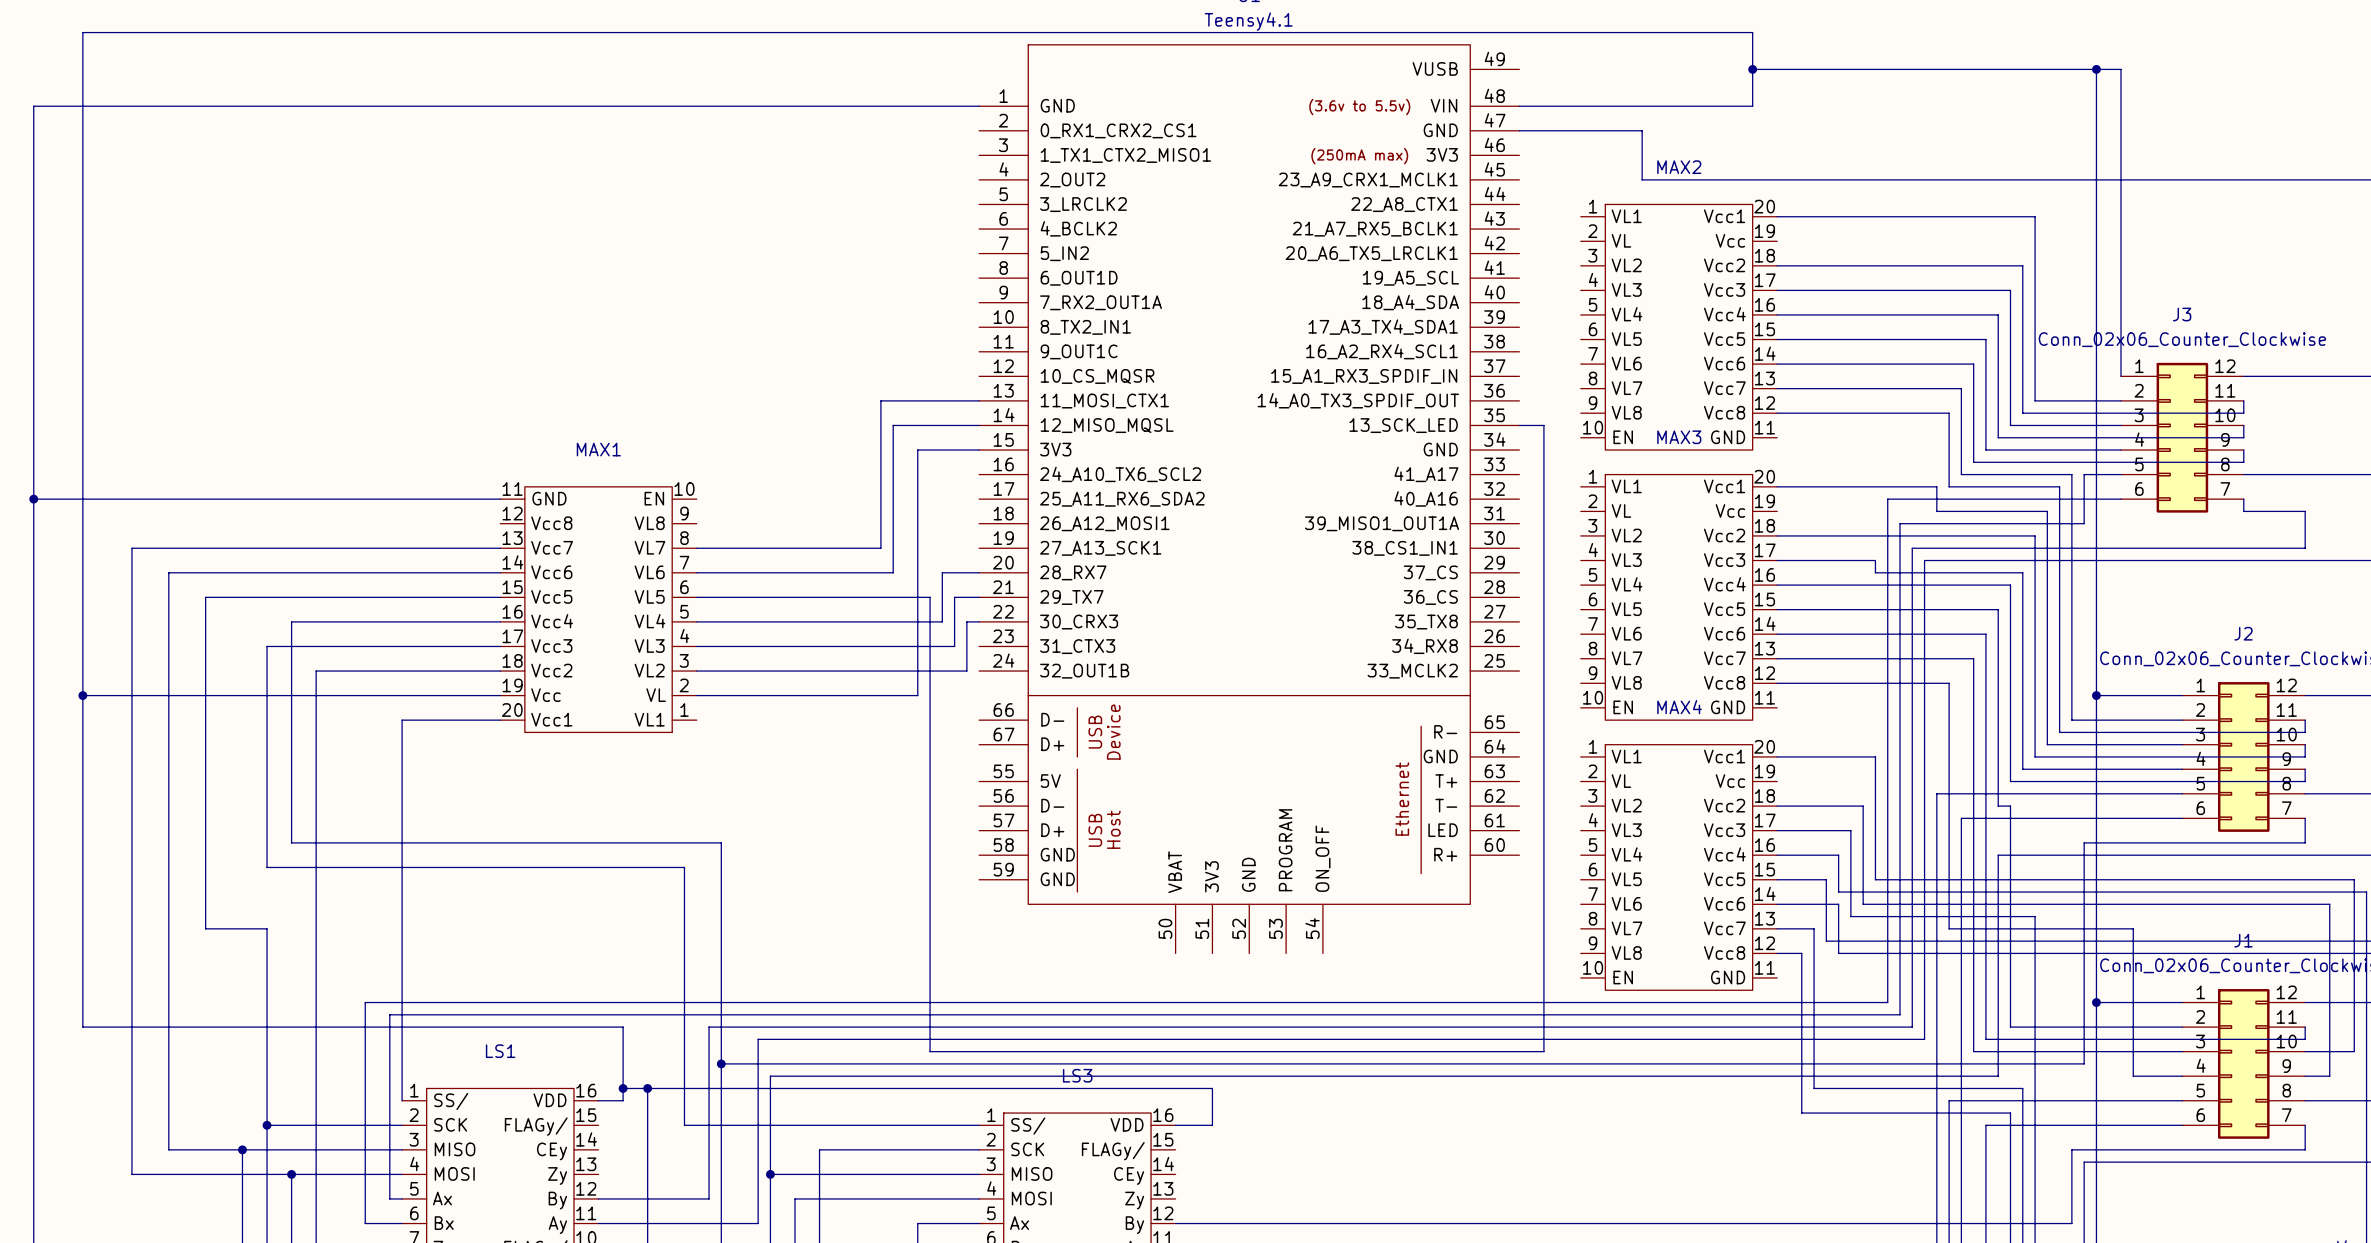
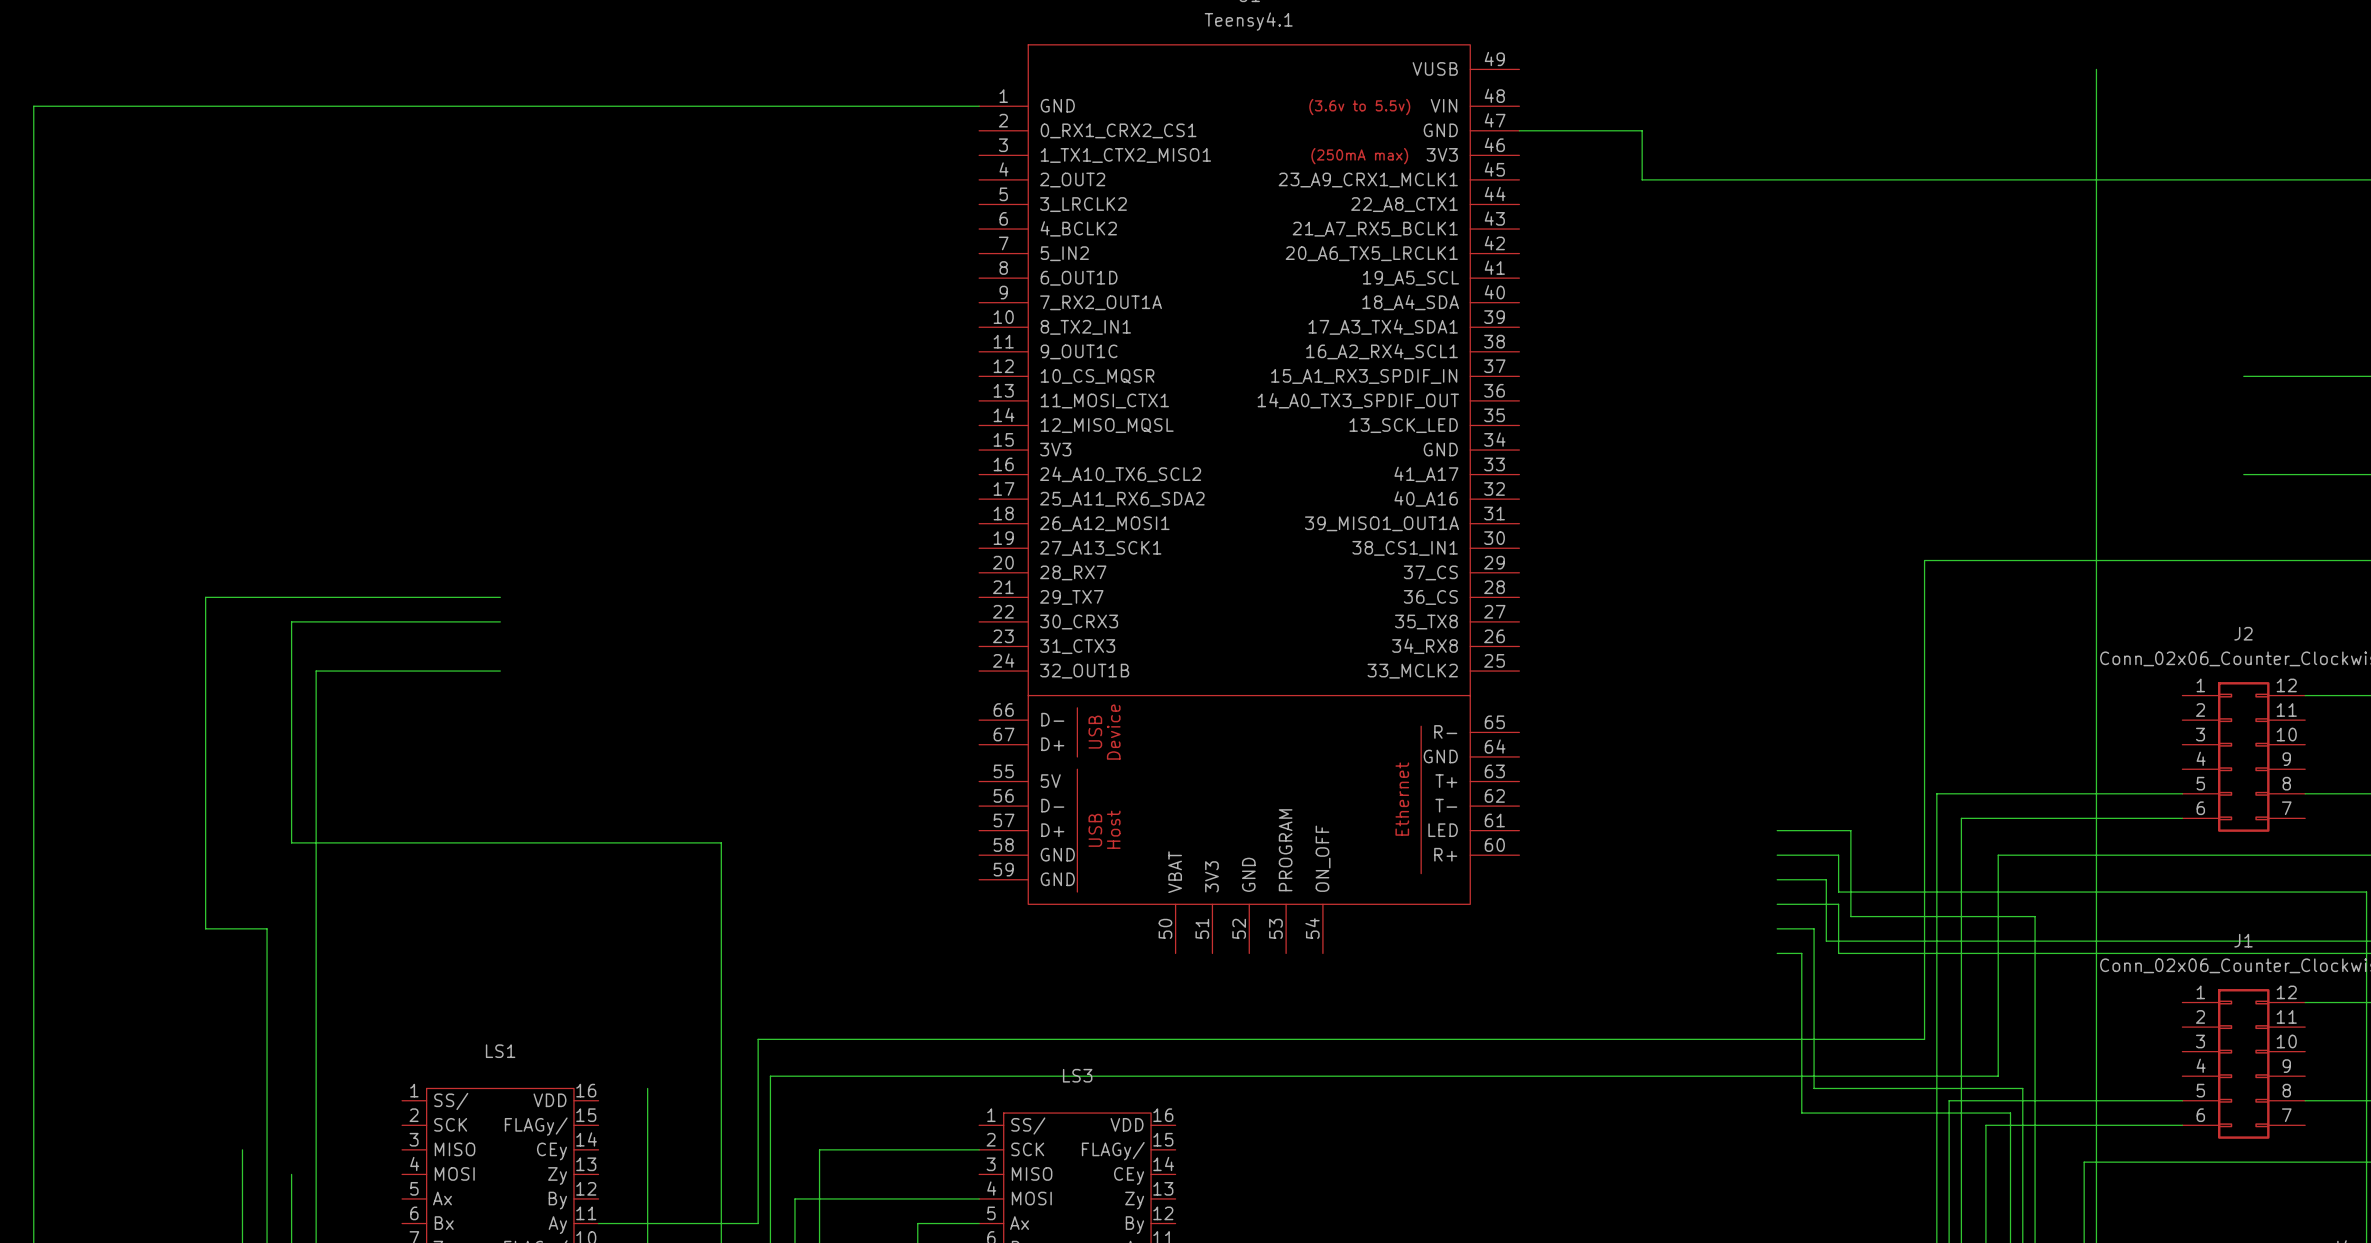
wire: (1752, 69) (2121, 69) (2121, 376) -> none
junction: (1752, 69) -> none
junction: (2096, 69) -> none
wire: (1519, 106) (1752, 106) (1752, 32) (82, 32) (82, 1027) (623, 1027) (623, 1100) (598, 1100) -> none
wire: (1777, 216) (2035, 216) (2035, 400) (2121, 400) -> none
wire: (1777, 265) (2022, 265) (2022, 413) (2243, 413) (2243, 400) -> none
wire: (1777, 290) (2010, 290) (2010, 425) (2121, 425) -> none
wire: (1777, 314) (1998, 314) (1998, 437) (2243, 437) (2243, 425) -> none
MAX2: (1678, 327) -> none
wire: (1777, 339) (1985, 339) (1985, 450) (2121, 450) -> none
wire: (1777, 364) (1973, 364) (1973, 462) (2243, 462) (2243, 450) -> none
wire: (1777, 388) (1961, 388) (1961, 474) (2071, 474) (2071, 720) (2182, 720) -> none
wire: (979, 400) (880, 400) (880, 548) (696, 548) -> none
wire: (1777, 413) (1949, 413) (1949, 486) (2059, 486) (2059, 732) (2305, 732) (2305, 720) -> none
wire: (979, 425) (893, 425) (893, 572) (696, 572) -> none
wire: (1519, 425) (1543, 425) (1543, 1051) (930, 1051) (930, 597) (696, 597) -> none
J3: Conn_02x06_Counter_Clockwise (2182, 437) -> none
wire: (979, 450) (917, 450) (917, 695) (696, 695) -> none
wire: (2121, 474) (2084, 474) (2084, 523) (1900, 523) (1900, 1014) (389, 1014) (389, 1198) (402, 1198) -> none
wire: (1777, 486) (1936, 486) (1936, 511) (2047, 511) (2047, 744) (2182, 744) -> none
wire: (33, 499) (500, 499) -> none
junction: (33, 499) -> none
wire: (2121, 499) (1887, 499) (1887, 1002) (365, 1002) (365, 1223) (402, 1223) -> none
wire: (2243, 499) (2243, 511) (2305, 511) (2305, 548) (1912, 548) (1912, 1027) (709, 1027) (709, 1198) (598, 1198) -> none
wire: (1777, 535) (2035, 535) (2035, 756) (2305, 756) (2305, 744) -> none
wire: (500, 548) (131, 548) (131, 1174) (402, 1174) -> none
wire: (1777, 560) (1875, 560) (1875, 572) (2022, 572) (2022, 769) (2182, 769) -> none
wire: (500, 572) (168, 572) (168, 1149) (402, 1149) -> none
wire: (979, 572) (942, 572) (942, 621) (696, 621) -> none
wire: (1777, 585) (2010, 585) (2010, 781) (2305, 781) (2305, 769) -> none
wire: (979, 597) (954, 597) (954, 646) (696, 646) -> none
MAX3: (1678, 597) -> none
MAX1: (598, 609) -> none
wire: (1777, 609) (1998, 609) (1998, 806) (2010, 806) (2010, 1027) (2182, 1027) -> none
wire: (979, 621) (966, 621) (966, 671) (696, 671) -> none
wire: (1777, 634) (1985, 634) (1985, 1039) (2305, 1039) (2305, 1027) -> none
wire: (500, 646) (267, 646) (267, 867) (684, 867) (684, 1125) (979, 1125) -> none
wire: (1777, 658) (1973, 658) (1973, 1051) (2182, 1051) -> none
wire: (1777, 683) (1949, 683) (1949, 928) (2133, 928) (2133, 1076) (2182, 1076) -> none
wire: (82, 695) (500, 695) -> none
junction: (82, 695) -> none
wire: (2096, 695) (2182, 695) -> none
junction: (2096, 695) -> none
wire: (500, 720) (402, 720) (402, 1100) -> none
wire: (1777, 756) (1875, 756) (1875, 879) (2354, 879) (2354, 1051) (2305, 1051) -> none
wire: (1777, 806) (1863, 806) (1863, 904) (2329, 904) (2329, 1076) (2305, 1076) -> none
wire: (2305, 818) (2305, 842) (2084, 842) (2084, 1063) (721, 1063) -> none
MAX4: (1678, 867) -> none
wire: (2096, 1002) (2182, 1002) -> none
junction: (2096, 1002) -> none
junction: (721, 1063) -> none
wire: (623, 1088) (1212, 1088) (1212, 1125) (1175, 1125) -> none
junction: (623, 1088) -> none
junction: (647, 1088) -> none
wire: (267, 1125) (402, 1125) -> none
junction: (267, 1125) -> none
wire: (2305, 1125) (2305, 1149) (2071, 1149) (2071, 1223) (1175, 1223) -> none
junction: (242, 1149) -> none
junction: (291, 1174) -> none
wire: (770, 1174) (979, 1174) -> none
junction: (770, 1174) -> none

